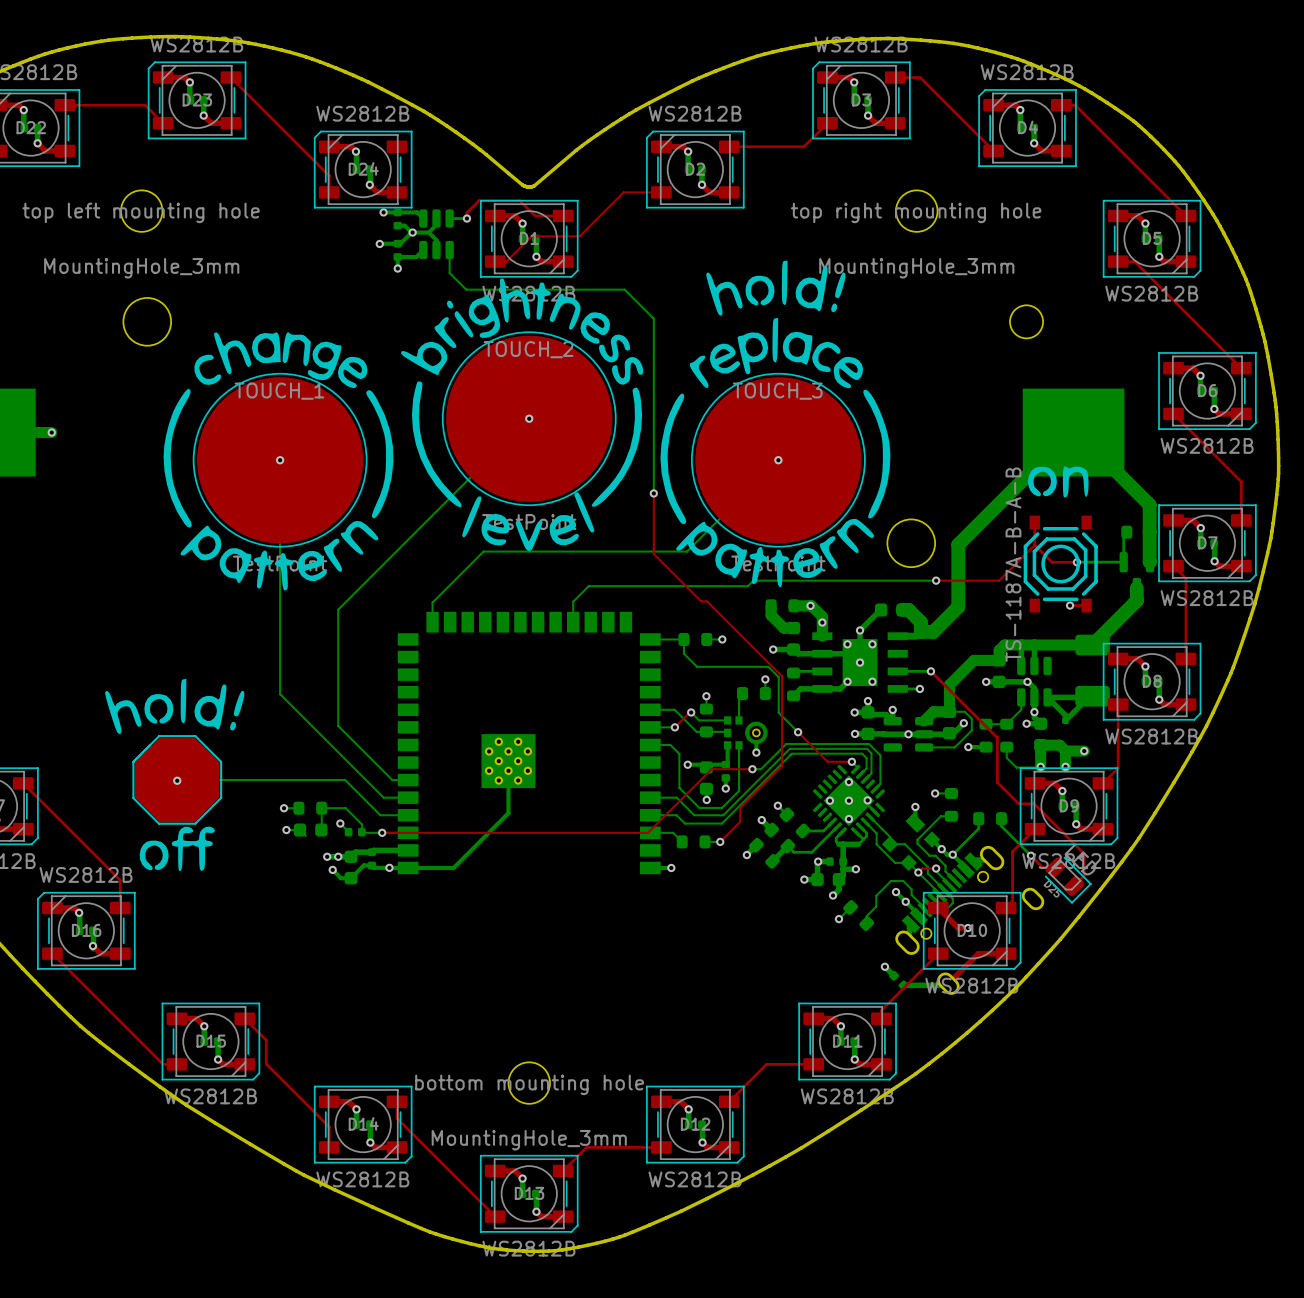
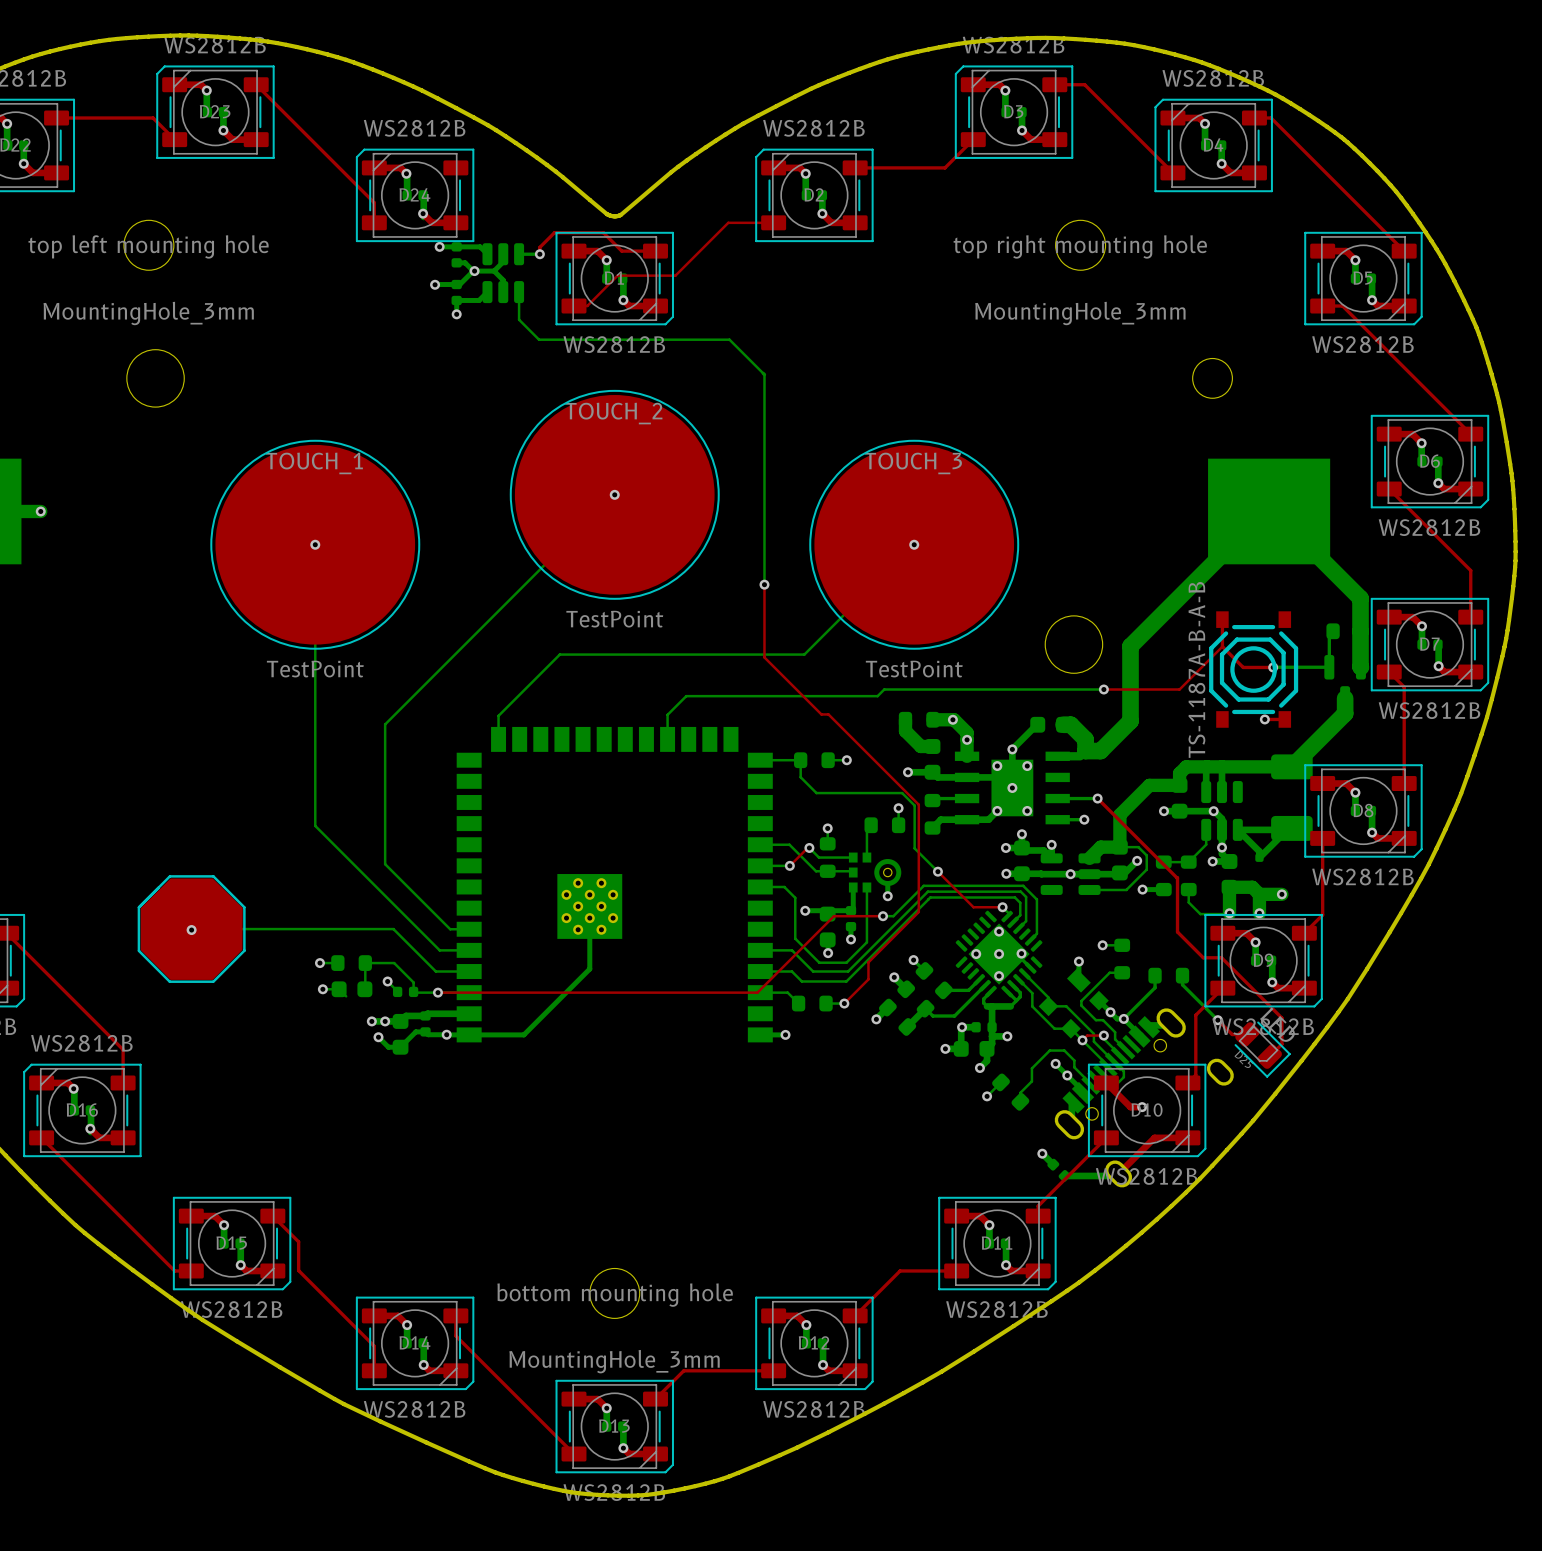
drawing: [105, 260, 1089, 872] -> none

